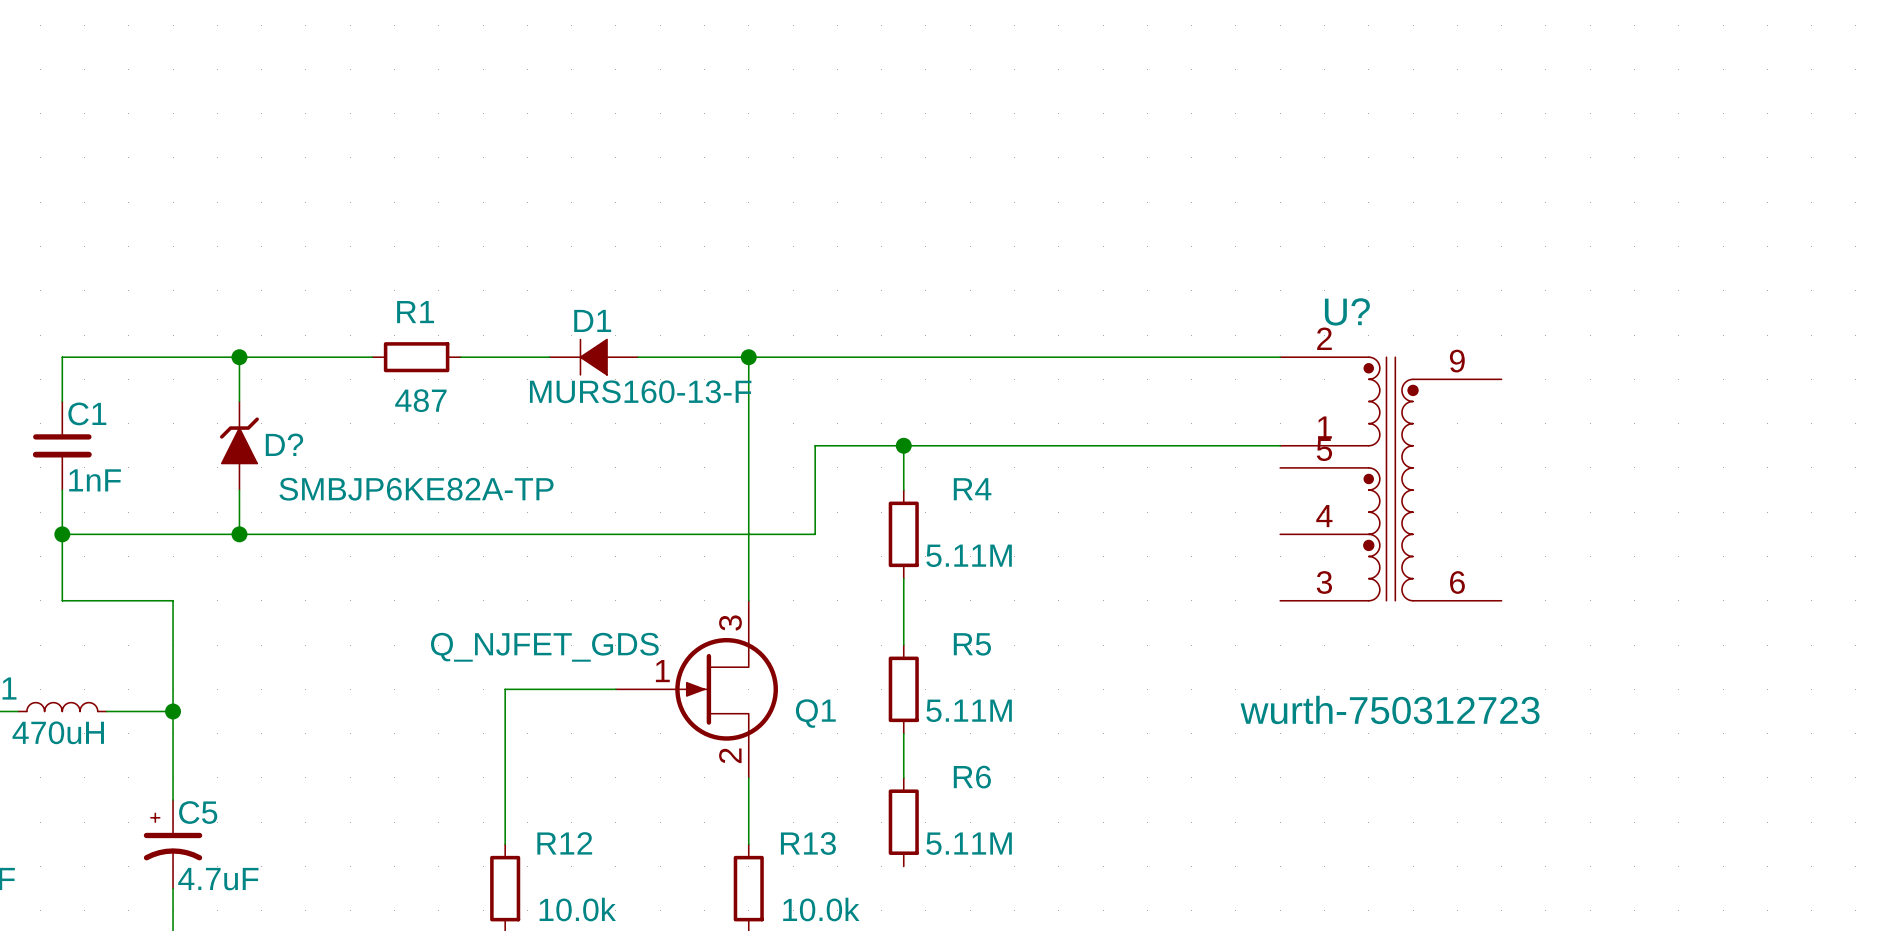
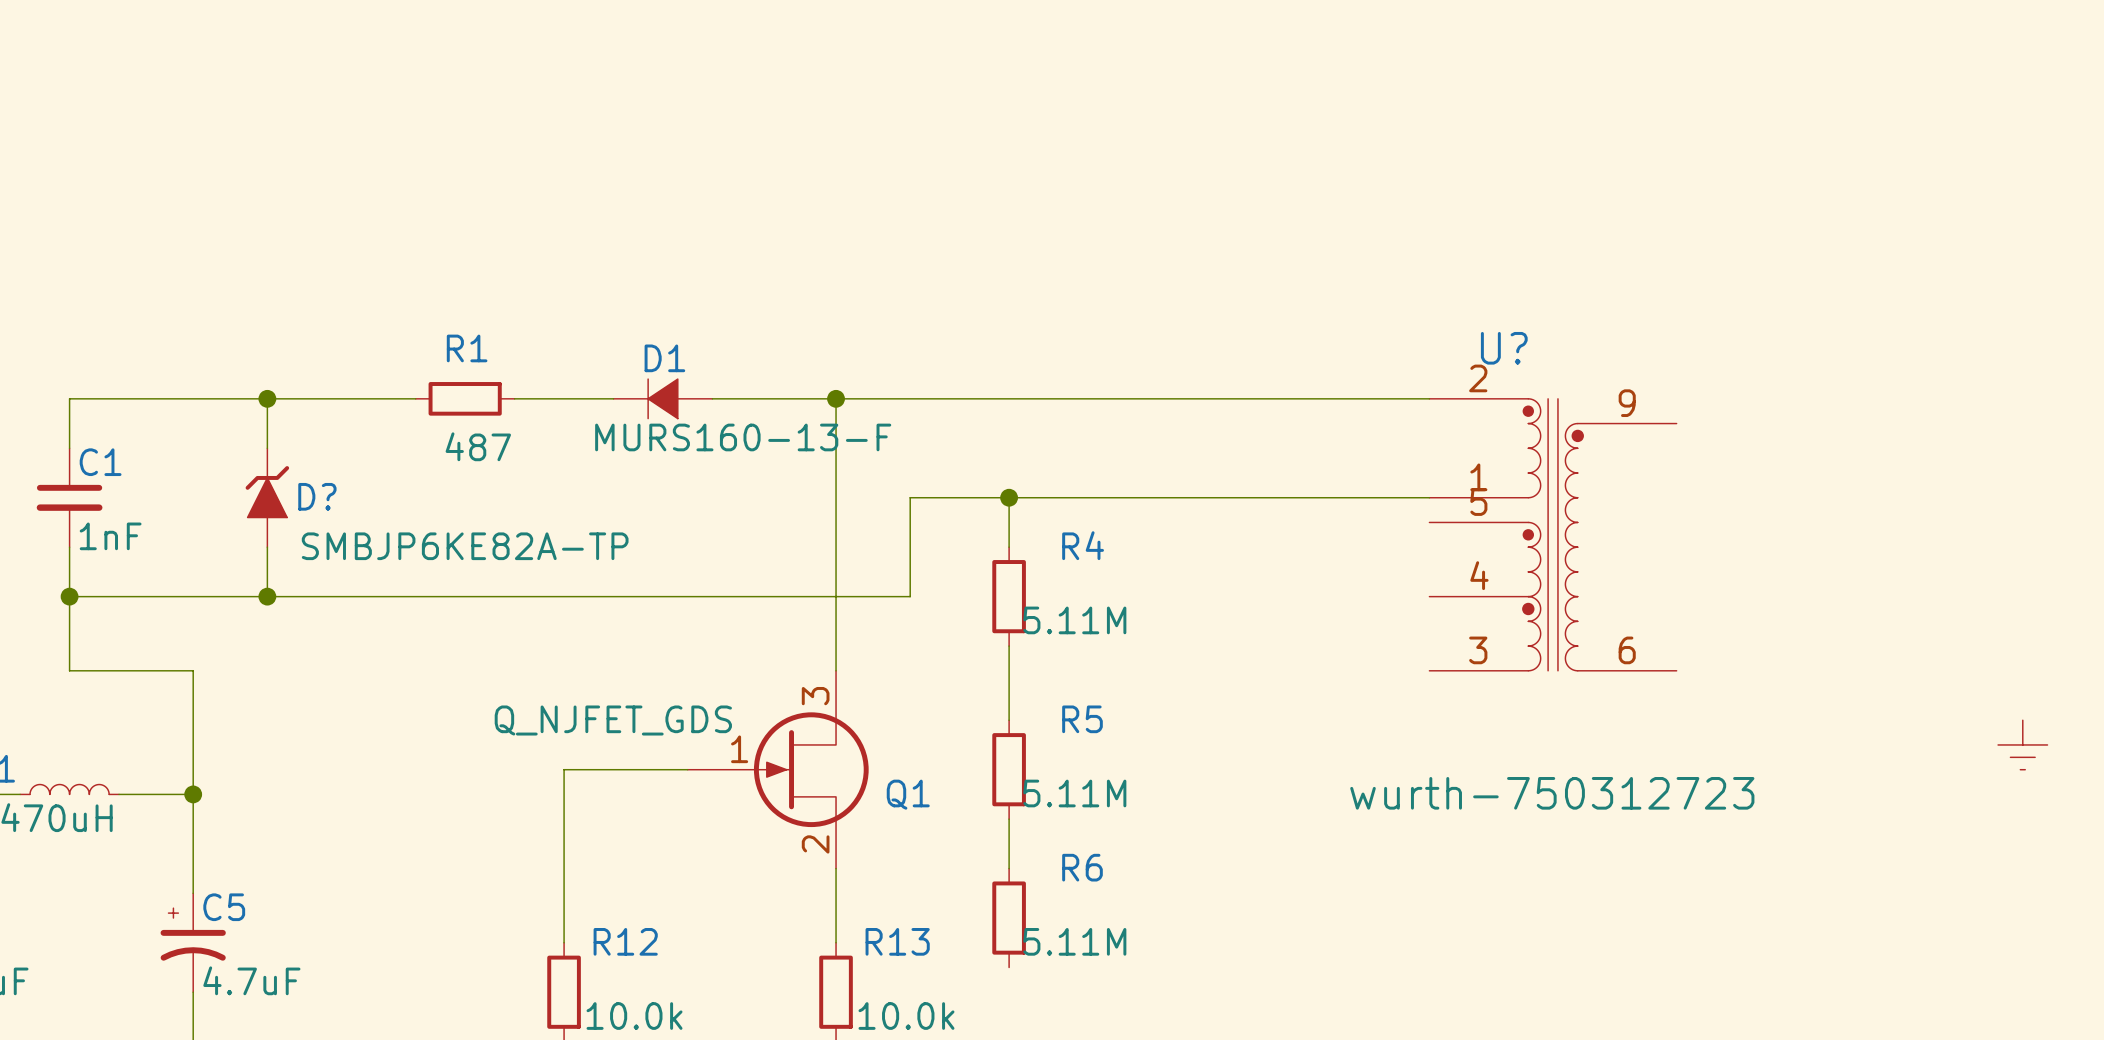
power symbol: none -> (2022, 744)

